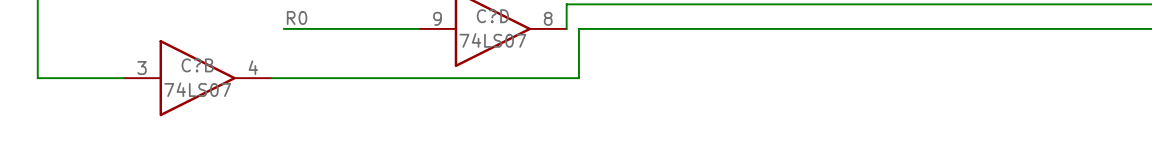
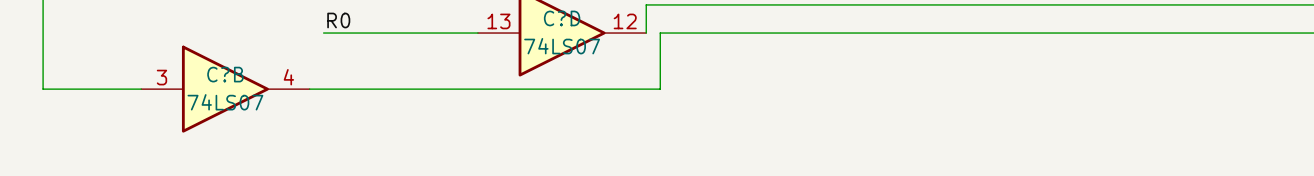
C?D pin number: 9 (437, 18) -> 13 (498, 21)
C?D pin number: 8 (548, 18) -> 12 (625, 21)

